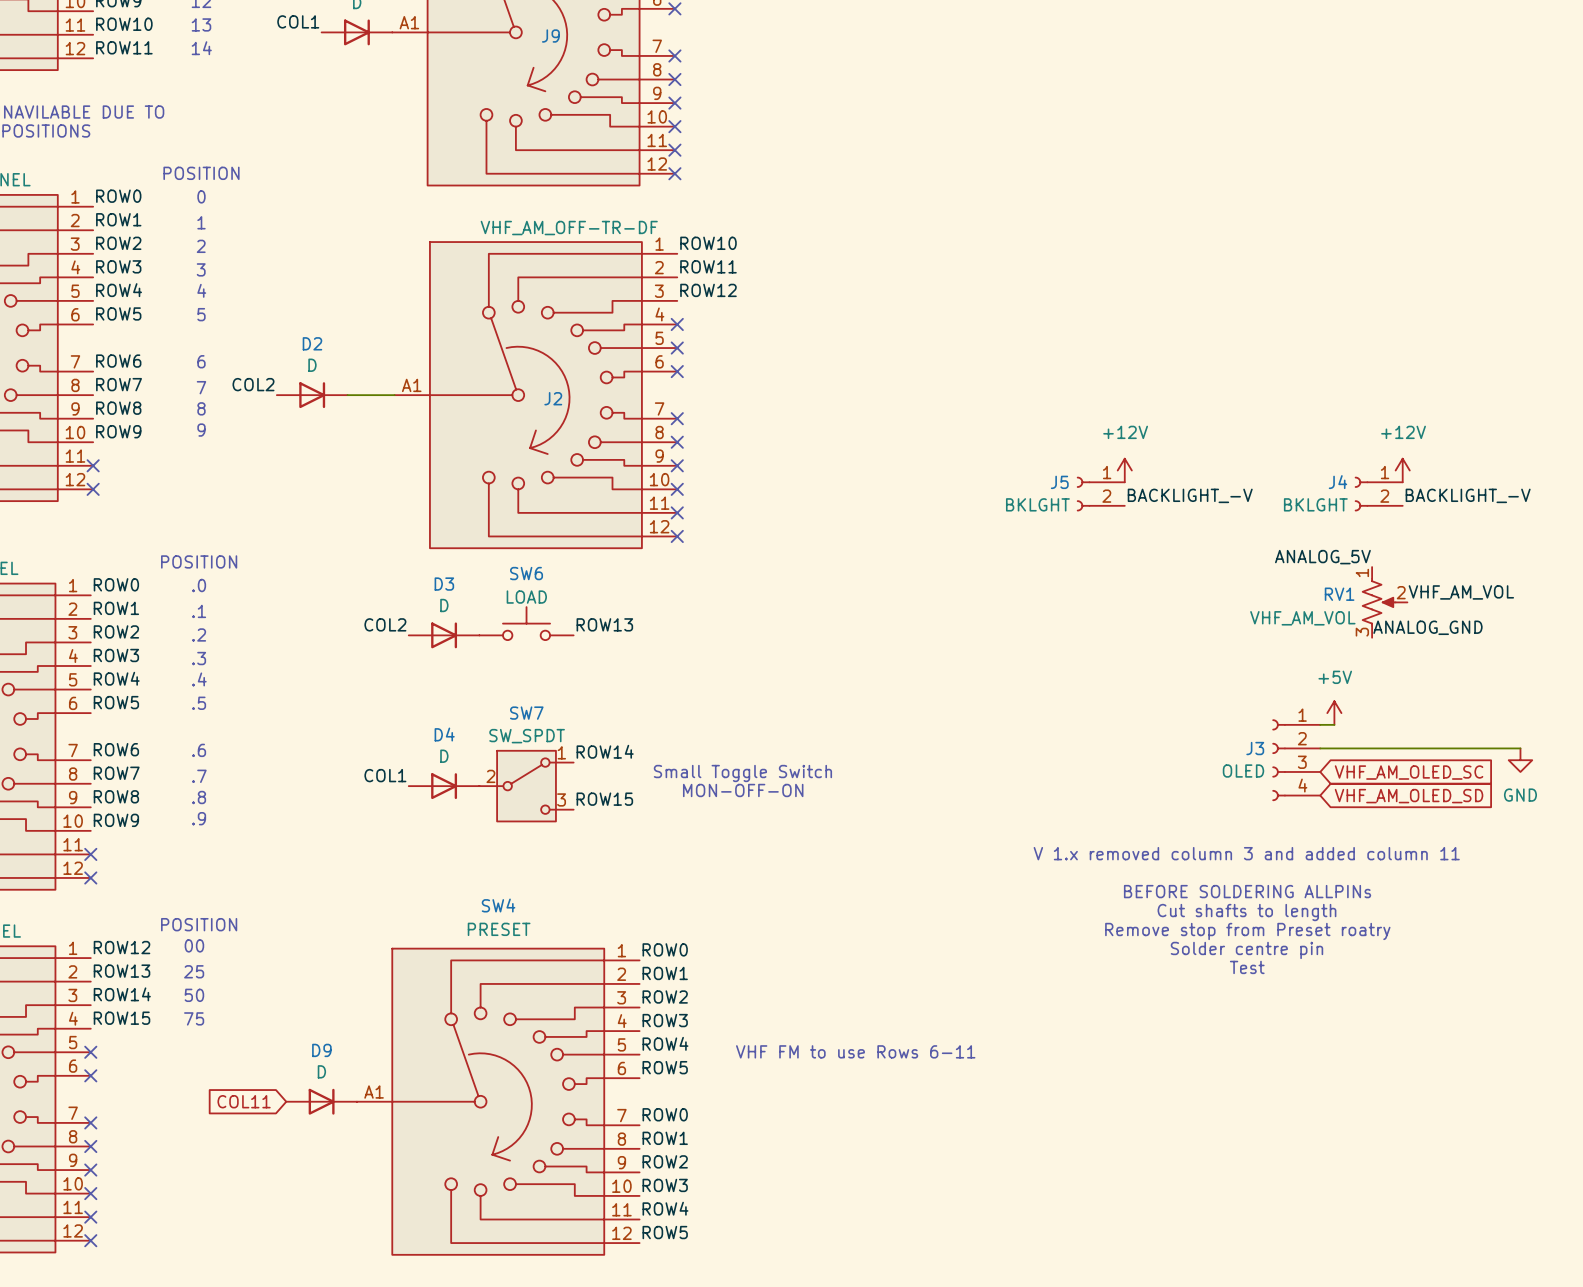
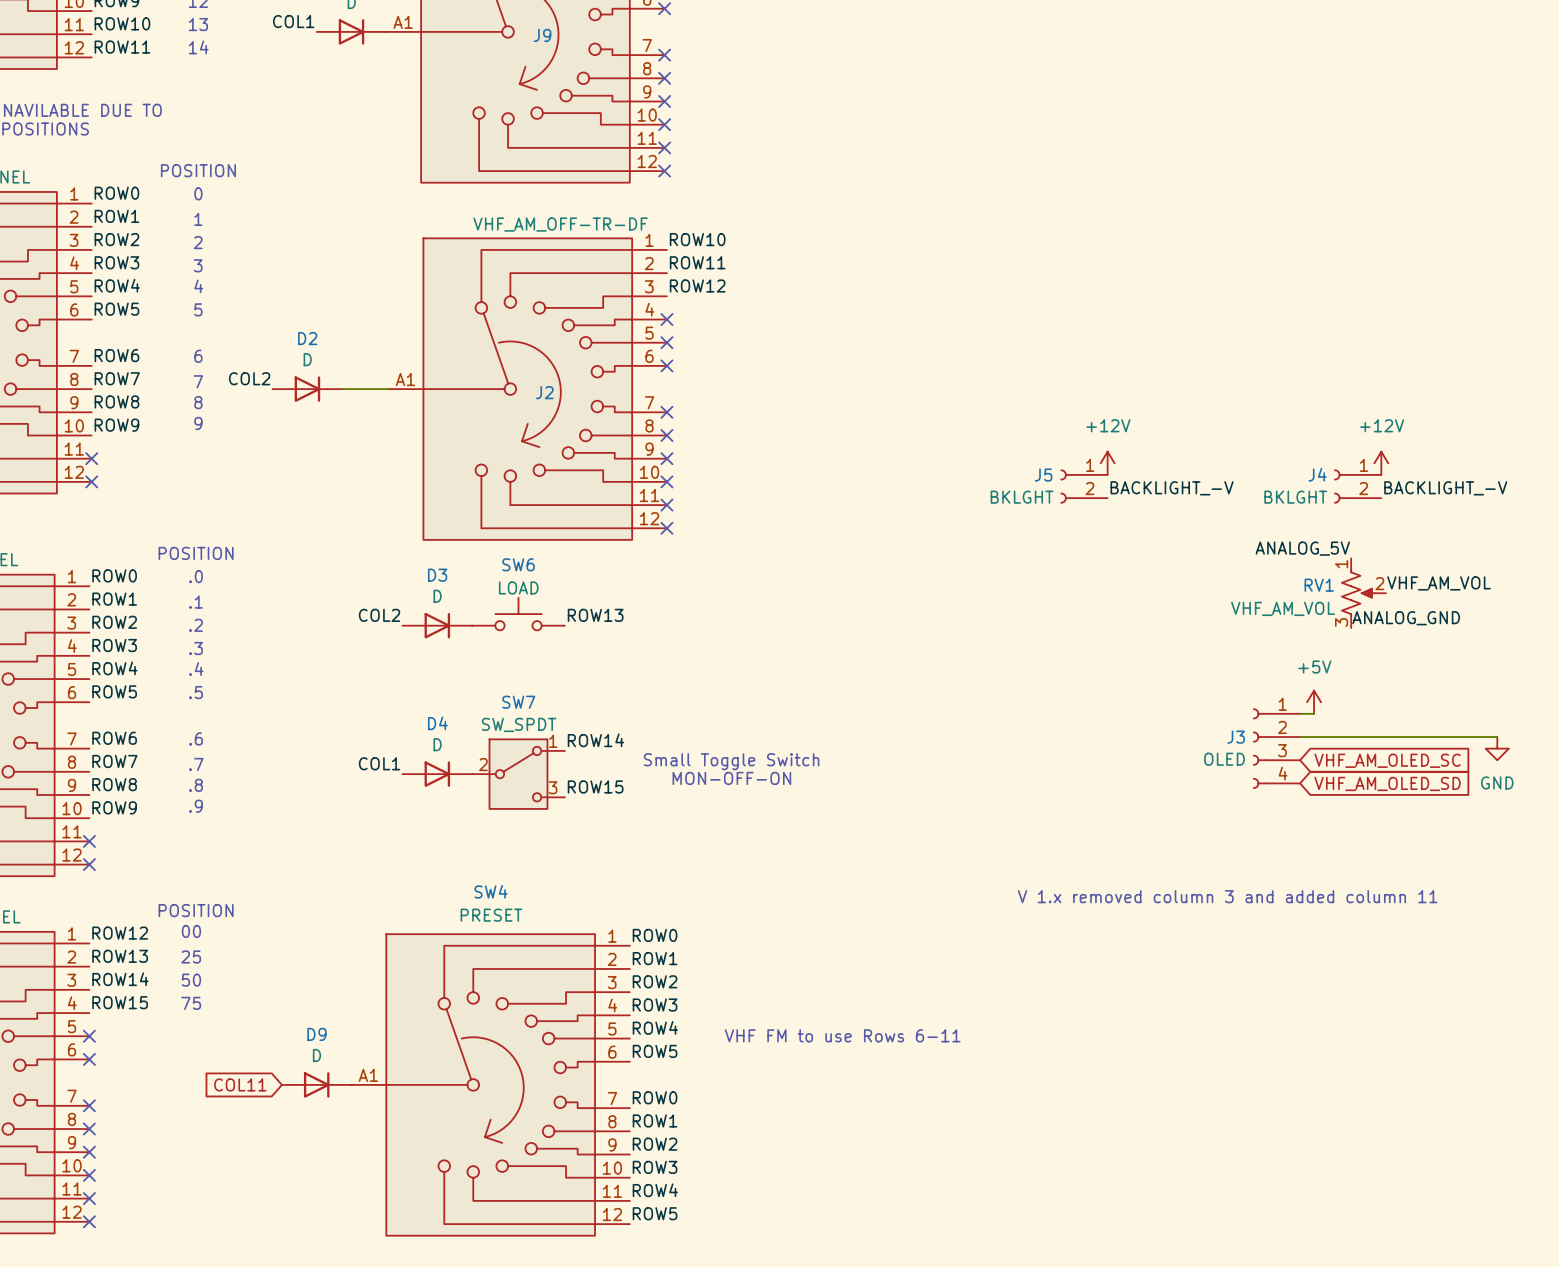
text: V 1.x removed column 3 and added column 11 (1246, 853) -> none
text: BEFORE SOLDERING ALLPINs (1247, 891) -> none
text: Cut shafts to length (1246, 912) -> V 1.x removed column 3 and added column 11 (1227, 896)
text: Remove stop from Preset roatry (1247, 931) -> none
text: Solder centre pin (1246, 950) -> none
text: Test (1247, 967) -> none

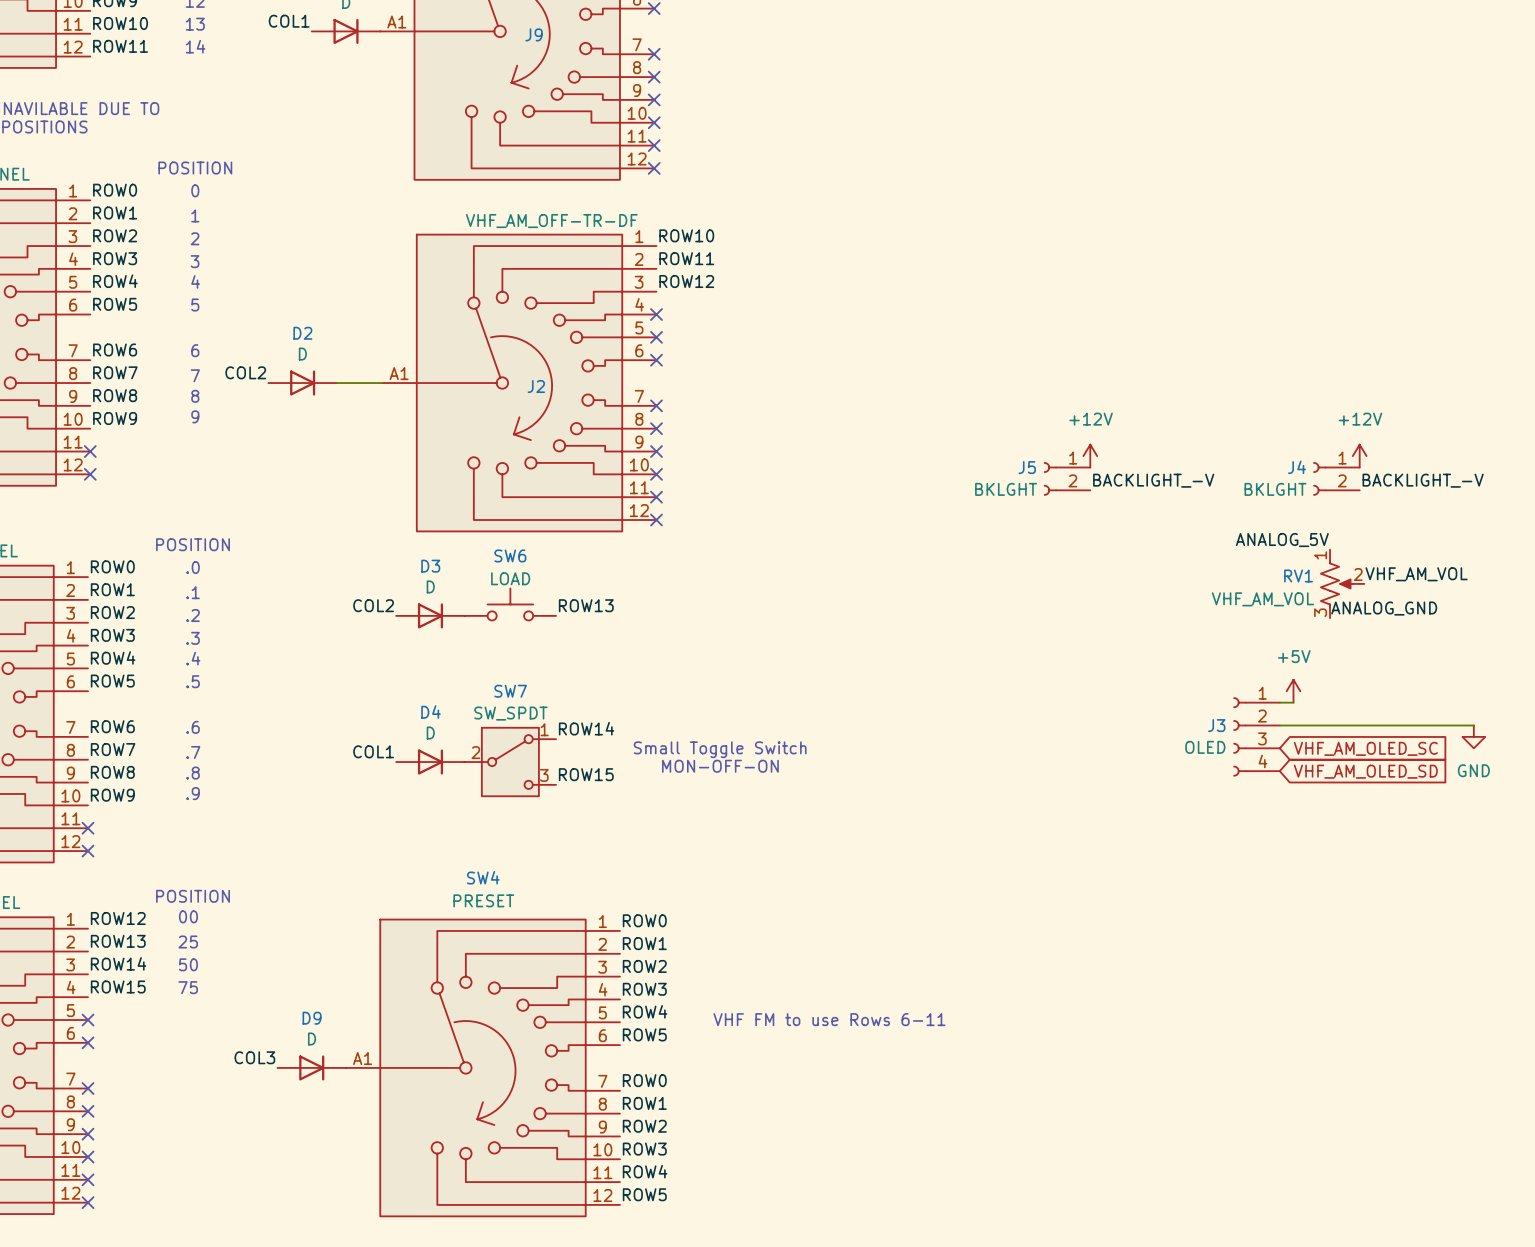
text: V 1.x removed column 3 and added column 11 (1227, 896) -> none
label: none -> COL3 (254, 1057)
global label: COL11 (240, 1084) -> none

